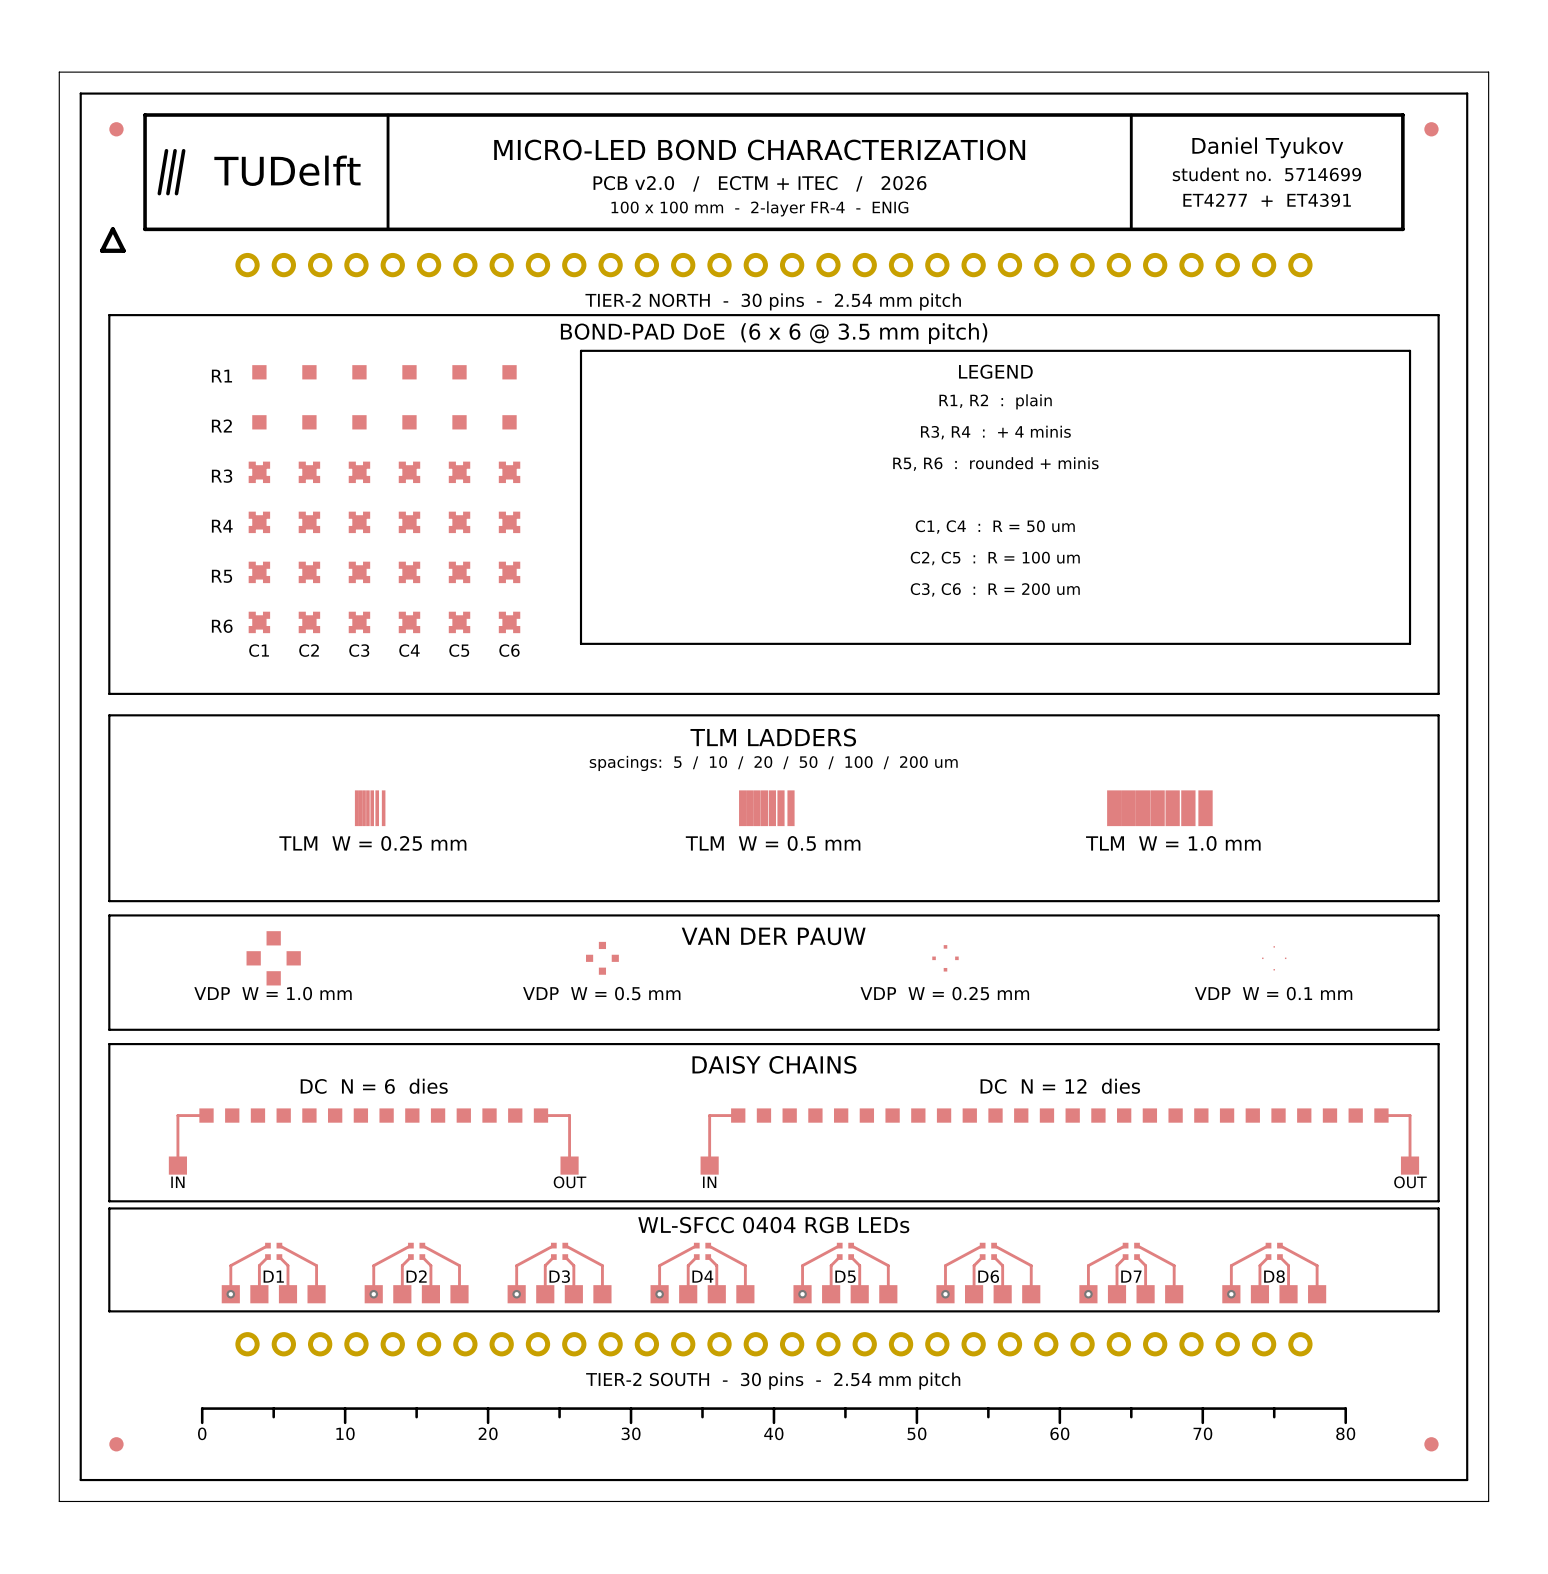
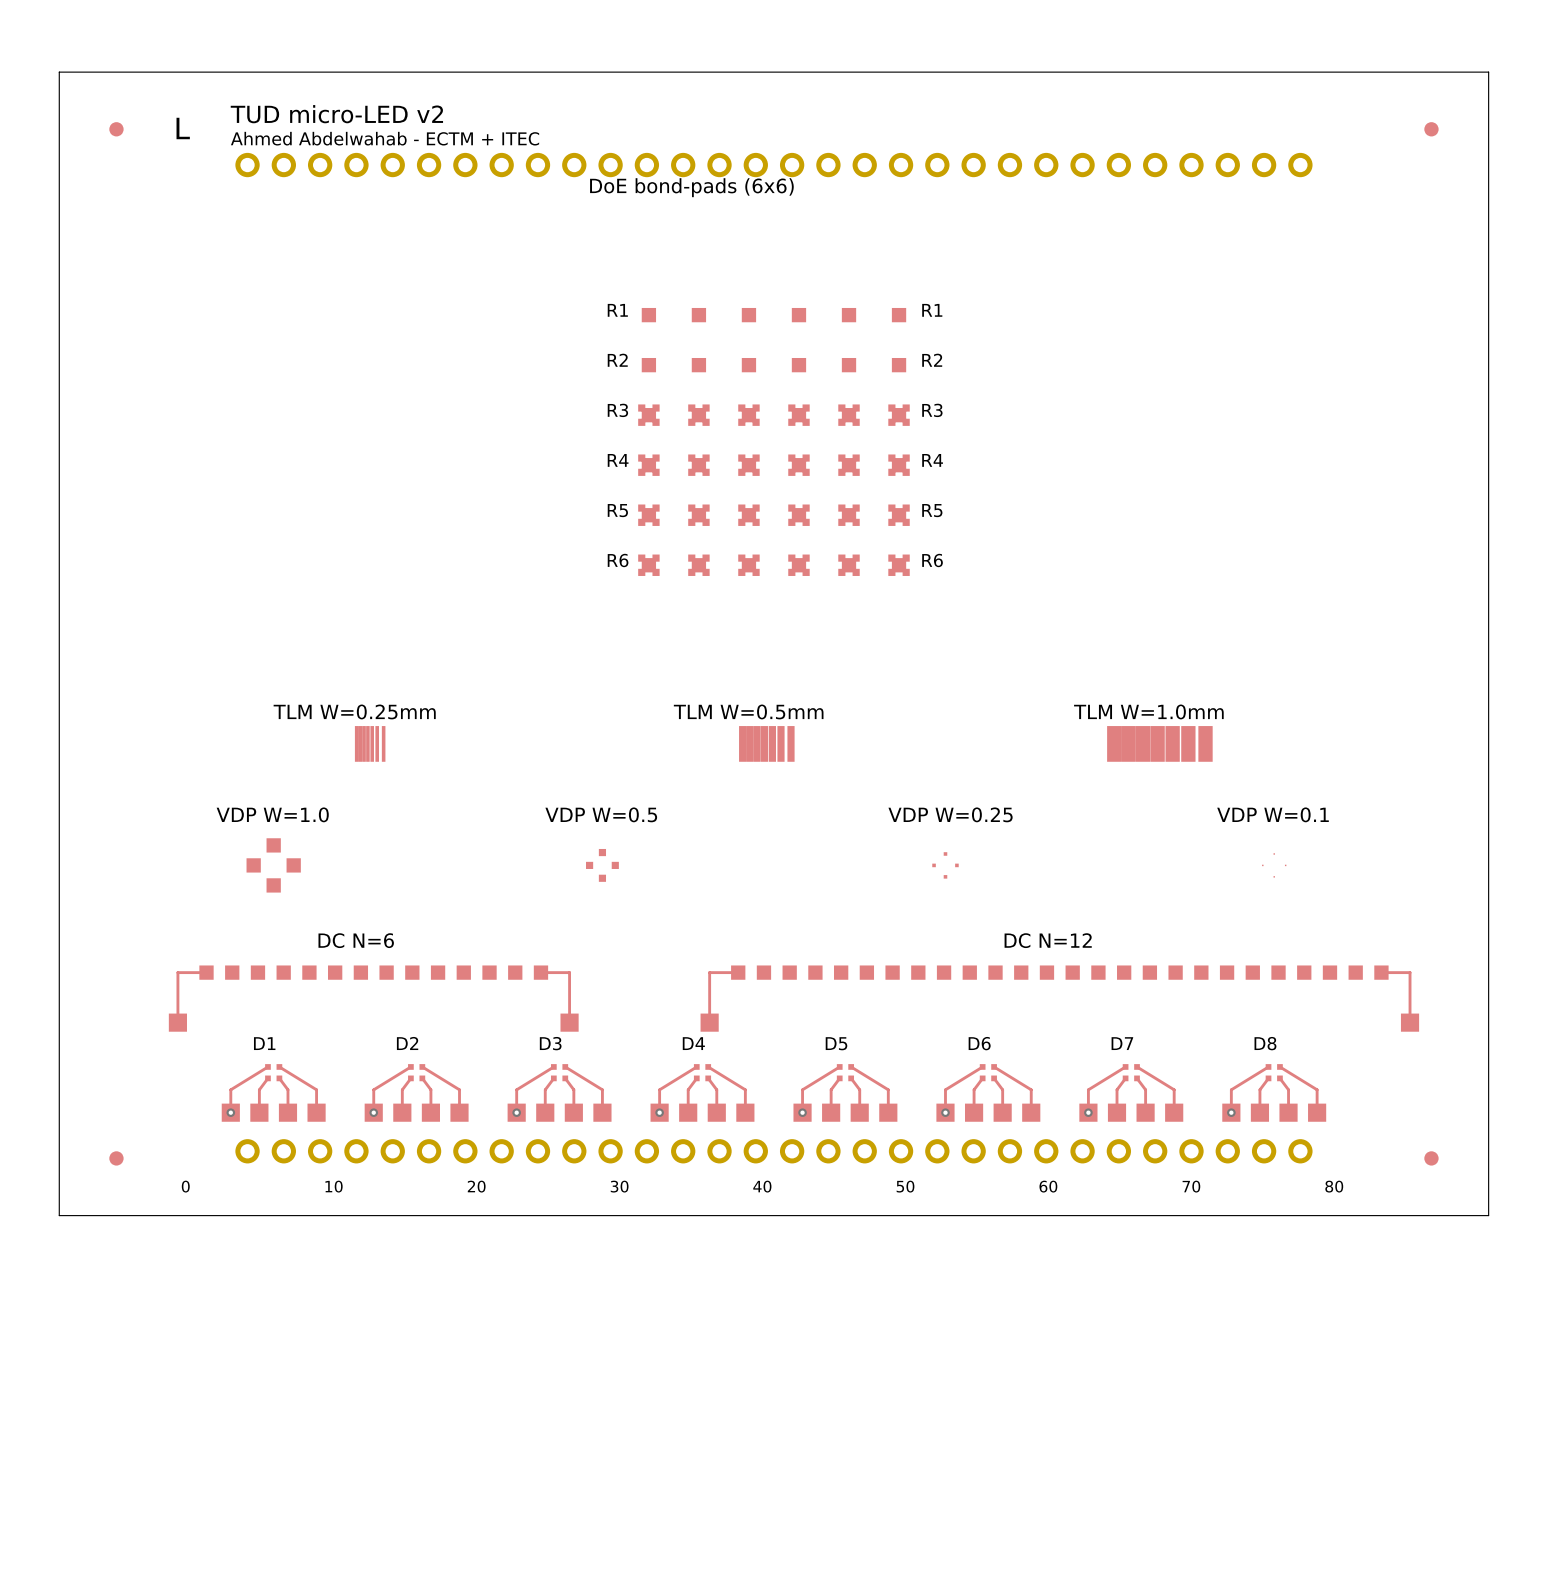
line: (80, 93) (1467, 93) (1467, 1480) (80, 1480) (80, 93) -> none
text: none -> TUD micro-LED v2 (336, 114)
line: (145, 115) (1402, 115) (1402, 229) (145, 229) (145, 115) -> none
line: (388, 115) (388, 229) -> none
line: (1131, 115) (1131, 229) -> none
text: none -> L (183, 128)
text: none -> Ahmed Abdelwahab - ECTM + ITEC (385, 138)
text: Daniel Tyukov (1267, 147) -> none
line: (166, 150) (159, 193) -> none
line: (175, 150) (167, 193) -> none
line: (183, 150) (176, 193) -> none
text: MICRO-LED BOND CHARACTERIZATION (759, 150) -> none
part: none -> (247, 165)
part: none -> (283, 165)
part: none -> (320, 165)
part: none -> (356, 165)
part: none -> (392, 165)
part: none -> (429, 165)
part: none -> (465, 165)
part: none -> (501, 165)
part: none -> (537, 165)
part: none -> (574, 165)
part: none -> (610, 165)
part: none -> (646, 165)
part: none -> (683, 165)
part: none -> (719, 165)
part: none -> (755, 165)
part: none -> (792, 165)
part: none -> (828, 165)
part: none -> (864, 165)
part: none -> (901, 165)
part: none -> (937, 165)
part: none -> (973, 165)
part: none -> (1009, 165)
part: none -> (1046, 165)
part: none -> (1082, 165)
part: none -> (1118, 165)
part: none -> (1155, 165)
part: none -> (1191, 165)
part: none -> (1227, 165)
part: none -> (1264, 165)
part: none -> (1300, 165)
text: TUDelft (287, 170) -> none
text: student no. 5714699 (1266, 174) -> none
text: PCB v2.0 / ECTM + ITEC / 2026 (759, 183) -> none
text: none -> DoE bond-pads (6x6) (691, 187)
text: ET4277 + ET4391 (1267, 200) -> none
text: 100 x 100 mm - 2-layer FR-4 - ENIG (759, 208) -> none
line: (112, 229) (123, 250) (102, 250) (112, 229) -> none
part: (247, 265) -> none
part: (283, 265) -> none
part: (320, 265) -> none
part: (356, 265) -> none
part: (392, 265) -> none
part: (429, 265) -> none
part: (465, 265) -> none
part: (501, 265) -> none
part: (537, 265) -> none
part: (574, 265) -> none
part: (610, 265) -> none
part: (646, 265) -> none
part: (683, 265) -> none
part: (719, 265) -> none
part: (755, 265) -> none
part: (792, 265) -> none
part: (828, 265) -> none
part: (864, 265) -> none
part: (901, 265) -> none
part: (937, 265) -> none
part: (973, 265) -> none
part: (1009, 265) -> none
part: (1046, 265) -> none
part: (1082, 265) -> none
part: (1118, 265) -> none
part: (1155, 265) -> none
part: (1191, 265) -> none
part: (1227, 265) -> none
part: (1264, 265) -> none
part: (1300, 265) -> none
text: TIER-2 NORTH - 30 pins - 2.54 mm pitch (773, 301) -> none
text: none -> R1 (617, 310)
text: none -> R1 (932, 310)
line: (109, 315) (1438, 315) (1438, 693) (109, 693) (109, 315) -> none
part: none -> (648, 315)
part: none -> (698, 315)
part: none -> (748, 315)
part: none -> (798, 315)
part: none -> (849, 315)
part: none -> (899, 315)
text: BOND-PAD DoE (6 x 6 @ 3.5 mm pitch) (774, 333) -> none
line: (581, 350) (1410, 350) (1410, 643) (581, 643) (581, 350) -> none
text: none -> R2 (617, 360)
text: none -> R2 (932, 360)
part: none -> (648, 365)
part: none -> (698, 365)
part: none -> (748, 365)
part: none -> (798, 365)
part: none -> (849, 365)
part: none -> (899, 365)
text: LEGEND (995, 371) -> none
part: (259, 372) -> none
part: (309, 372) -> none
part: (359, 372) -> none
part: (409, 372) -> none
part: (459, 372) -> none
part: (509, 372) -> none
text: R1 (221, 376) -> none
text: R1, R2 : plain (995, 401) -> none
text: none -> R3 (617, 410)
text: none -> R3 (932, 410)
part: none -> (648, 415)
part: none -> (698, 415)
part: none -> (748, 415)
part: none -> (798, 415)
part: none -> (849, 415)
part: none -> (899, 415)
part: (259, 422) -> none
part: (309, 422) -> none
part: (359, 422) -> none
part: (409, 422) -> none
part: (459, 422) -> none
part: (509, 422) -> none
text: R2 (221, 426) -> none
text: R3, R4 : + 4 minis (995, 432) -> none
text: none -> R4 (618, 460)
text: none -> R4 (932, 460)
text: R5, R6 : rounded + minis (995, 464) -> none
part: none -> (648, 465)
part: none -> (698, 465)
part: none -> (748, 465)
part: none -> (798, 465)
part: none -> (849, 465)
part: none -> (899, 465)
part: (259, 472) -> none
part: (309, 472) -> none
part: (359, 472) -> none
part: (409, 472) -> none
part: (459, 472) -> none
part: (509, 472) -> none
text: R3 (222, 476) -> none
text: none -> R5 (617, 510)
text: none -> R5 (932, 510)
part: none -> (648, 515)
part: none -> (698, 515)
part: none -> (748, 515)
part: none -> (798, 515)
part: none -> (849, 515)
part: none -> (899, 515)
part: (259, 522) -> none
part: (309, 522) -> none
part: (359, 522) -> none
part: (409, 522) -> none
part: (459, 522) -> none
part: (509, 522) -> none
text: R4 (222, 526) -> none
text: C1, C4 : R = 50 um (995, 527) -> none
text: C2, C5 : R = 100 um (995, 558) -> none
text: none -> R6 (618, 560)
text: none -> R6 (932, 560)
part: none -> (648, 565)
part: none -> (698, 565)
part: none -> (748, 565)
part: none -> (798, 565)
part: none -> (849, 565)
part: none -> (899, 565)
part: (259, 572) -> none
part: (309, 572) -> none
part: (359, 572) -> none
part: (409, 572) -> none
part: (459, 572) -> none
part: (509, 572) -> none
text: R5 (222, 576) -> none
text: C3, C6 : R = 200 um (995, 589) -> none
part: (259, 622) -> none
part: (309, 622) -> none
part: (359, 622) -> none
part: (409, 622) -> none
part: (459, 622) -> none
part: (509, 622) -> none
text: R6 (222, 626) -> none
text: C1 (259, 650) -> none
text: C2 (309, 650) -> none
text: C3 (359, 650) -> none
text: C4 (409, 650) -> none
text: C5 (459, 650) -> none
text: C6 (509, 650) -> none
text: none -> TLM W=0.25mm (354, 711)
text: none -> TLM W=0.5mm (748, 711)
text: none -> TLM W=1.0mm (1148, 711)
line: (109, 715) (109, 901) (1438, 901) (1438, 715) (109, 715) -> none
text: TLM LADDERS (773, 737) -> none
text: spacings: 5 / 10 / 20 / 50 / 100 / 200 um (773, 763) -> none
part position: (370, 808) -> (370, 743)
part position: (766, 808) -> (766, 743)
part position: (1159, 808) -> (1159, 743)
text: none -> VDP W=1.0 (272, 814)
text: none -> VDP W=0.5 (601, 814)
text: none -> VDP W=0.25 (950, 814)
text: none -> VDP W=0.1 (1273, 814)
text: TLM W = 0.25 mm (372, 843) -> none
text: TLM W = 0.5 mm (773, 843) -> none
text: TLM W = 1.0 mm (1173, 843) -> none
line: (109, 915) (109, 1029) (1438, 1029) (1438, 915) (109, 915) -> none
text: VAN DER PAUW (773, 936) -> none
text: none -> DC N=6 (356, 940)
text: none -> DC N=12 (1048, 940)
part position: (273, 958) -> (273, 865)
part position: (602, 958) -> (602, 865)
part position: (945, 958) -> (945, 865)
part position: (1274, 958) -> (1274, 865)
part: none -> (373, 972)
text: VDP W = 1.0 mm (273, 993) -> none
text: VDP W = 0.5 mm (601, 993) -> none
text: VDP W = 0.25 mm (944, 993) -> none
text: VDP W = 0.1 mm (1273, 993) -> none
part: none -> (177, 1022)
part: none -> (569, 1022)
part: none -> (709, 1022)
part: none -> (1410, 1022)
line: (109, 1044) (109, 1201) (1438, 1201) (1438, 1044) (109, 1044) -> none
text: DAISY CHAINS (774, 1064) -> none
track: none -> (267, 1066) (230, 1089) (230, 1112)
track: none -> (279, 1066) (316, 1089) (316, 1112)
track: none -> (410, 1066) (373, 1089) (373, 1112)
track: none -> (422, 1066) (459, 1089) (459, 1112)
track: none -> (553, 1066) (516, 1089) (516, 1112)
track: none -> (565, 1066) (602, 1089) (602, 1112)
track: none -> (696, 1066) (659, 1089) (659, 1112)
track: none -> (708, 1066) (745, 1089) (745, 1112)
track: none -> (839, 1066) (802, 1089) (802, 1112)
track: none -> (851, 1066) (888, 1089) (888, 1112)
track: none -> (982, 1066) (945, 1089) (945, 1112)
track: none -> (994, 1066) (1031, 1089) (1031, 1112)
track: none -> (1125, 1066) (1088, 1089) (1088, 1112)
track: none -> (1137, 1066) (1174, 1089) (1174, 1112)
track: none -> (1268, 1066) (1231, 1089) (1231, 1112)
track: none -> (1279, 1066) (1317, 1089) (1317, 1112)
part: none -> (273, 1072)
part: none -> (416, 1072)
part: none -> (559, 1072)
part: none -> (702, 1072)
part: none -> (845, 1072)
part: none -> (988, 1072)
part: none -> (1131, 1072)
part: none -> (1274, 1072)
track: none -> (267, 1078) (259, 1089) (259, 1112)
track: none -> (279, 1078) (287, 1089) (287, 1112)
track: none -> (410, 1078) (402, 1089) (402, 1112)
track: none -> (422, 1078) (430, 1089) (430, 1112)
track: none -> (553, 1078) (545, 1089) (545, 1112)
track: none -> (565, 1078) (573, 1089) (573, 1112)
track: none -> (696, 1078) (688, 1089) (688, 1112)
track: none -> (708, 1078) (716, 1089) (716, 1112)
track: none -> (839, 1078) (831, 1089) (831, 1112)
track: none -> (851, 1078) (859, 1089) (859, 1112)
track: none -> (982, 1078) (974, 1089) (974, 1112)
track: none -> (994, 1078) (1002, 1089) (1002, 1112)
track: none -> (1125, 1078) (1117, 1089) (1117, 1112)
track: none -> (1137, 1078) (1145, 1089) (1145, 1112)
track: none -> (1268, 1078) (1259, 1089) (1259, 1112)
track: none -> (1279, 1078) (1288, 1089) (1288, 1112)
text: DC N = 6 dies (374, 1086) -> none
text: DC N = 12 dies (1060, 1086) -> none
part footprint: [199, 1108, 549, 1123] -> [364, 1103, 383, 1122]
part: none -> (230, 1112)
via: none -> (230, 1112)
part: none -> (259, 1112)
part: none -> (287, 1112)
part: none -> (316, 1112)
via: none -> (373, 1112)
part: none -> (402, 1112)
part: none -> (430, 1112)
part: none -> (459, 1112)
part: none -> (516, 1112)
via: none -> (516, 1112)
part: none -> (545, 1112)
part: none -> (573, 1112)
part: none -> (602, 1112)
part: none -> (659, 1112)
via: none -> (659, 1112)
part: none -> (688, 1112)
part: none -> (716, 1112)
part: none -> (745, 1112)
part: none -> (802, 1112)
via: none -> (802, 1112)
part: none -> (831, 1112)
part: none -> (859, 1112)
part: none -> (888, 1112)
part: none -> (945, 1112)
via: none -> (945, 1112)
part: none -> (974, 1112)
part: none -> (1002, 1112)
part: none -> (1031, 1112)
part: none -> (1088, 1112)
via: none -> (1088, 1112)
part: none -> (1117, 1112)
part: none -> (1145, 1112)
part: none -> (1174, 1112)
part: none -> (1231, 1112)
via: none -> (1231, 1112)
part: none -> (1259, 1112)
part: none -> (1288, 1112)
part: none -> (1317, 1112)
track: (206, 1115) (177, 1115) (177, 1165) -> (206, 972) (177, 972) (177, 1022)
track: (540, 1115) (569, 1115) (569, 1165) -> (540, 972) (569, 972) (569, 1022)
track: (738, 1115) (709, 1115) (709, 1165) -> (738, 972) (709, 972) (709, 1022)
part position: (1059, 1115) -> (1059, 972)
track: (1381, 1115) (1410, 1115) (1410, 1165) -> (1381, 972) (1410, 972) (1410, 1022)
part: none -> (247, 1151)
part: none -> (283, 1151)
part: none -> (320, 1151)
part: none -> (356, 1151)
part: none -> (392, 1151)
part: none -> (429, 1151)
part: none -> (465, 1151)
part: none -> (501, 1151)
part: none -> (537, 1151)
part: none -> (574, 1151)
part: none -> (610, 1151)
part: none -> (646, 1151)
part: none -> (683, 1151)
part: none -> (719, 1151)
part: none -> (755, 1151)
part: none -> (792, 1151)
part: none -> (828, 1151)
part: none -> (864, 1151)
part: none -> (901, 1151)
part: none -> (937, 1151)
part: none -> (973, 1151)
part: none -> (1009, 1151)
part: none -> (1046, 1151)
part: none -> (1082, 1151)
part: none -> (1118, 1151)
part: none -> (1155, 1151)
part: none -> (1191, 1151)
part: none -> (1227, 1151)
part: none -> (1264, 1151)
part: none -> (1300, 1151)
part: (177, 1165) -> none
part: (569, 1165) -> none
part: (709, 1165) -> none
part: (1410, 1165) -> none
text: IN (177, 1182) -> none
text: OUT (570, 1182) -> none
text: IN (709, 1182) -> none
text: OUT (1410, 1182) -> none
line: (109, 1208) (109, 1311) (1438, 1311) (1438, 1208) (109, 1208) -> none
board edge: (59, 1215) (59, 1501) (1488, 1501) (1488, 1215) -> (59, 1215) (1488, 1215)
text: WL-SFCC 0404 RGB LEDs (773, 1225) -> none
track: (267, 1245) (230, 1265) (230, 1294) -> none
track: (279, 1245) (316, 1265) (316, 1294) -> none
track: (410, 1245) (373, 1265) (373, 1294) -> none
track: (422, 1245) (459, 1265) (459, 1294) -> none
track: (553, 1245) (516, 1265) (516, 1294) -> none
track: (565, 1245) (602, 1265) (602, 1294) -> none
track: (696, 1245) (659, 1265) (659, 1294) -> none
track: (708, 1245) (745, 1265) (745, 1294) -> none
track: (839, 1245) (802, 1265) (802, 1294) -> none
track: (851, 1245) (888, 1265) (888, 1294) -> none
track: (982, 1245) (945, 1265) (945, 1294) -> none
track: (994, 1245) (1031, 1265) (1031, 1294) -> none
track: (1125, 1245) (1088, 1265) (1088, 1294) -> none
track: (1137, 1245) (1174, 1265) (1174, 1294) -> none
track: (1268, 1245) (1231, 1265) (1231, 1294) -> none
track: (1279, 1245) (1317, 1265) (1317, 1294) -> none
part: (273, 1251) -> none
part: (416, 1251) -> none
part: (559, 1251) -> none
part: (702, 1251) -> none
part: (845, 1251) -> none
part: (988, 1251) -> none
part: (1131, 1251) -> none
part: (1274, 1251) -> none
track: (267, 1257) (259, 1265) (259, 1294) -> none
track: (279, 1257) (287, 1265) (287, 1294) -> none
track: (410, 1257) (402, 1265) (402, 1294) -> none
track: (422, 1257) (430, 1265) (430, 1294) -> none
track: (553, 1257) (545, 1265) (545, 1294) -> none
track: (565, 1257) (573, 1265) (573, 1294) -> none
track: (696, 1257) (688, 1265) (688, 1294) -> none
track: (708, 1257) (716, 1265) (716, 1294) -> none
track: (839, 1257) (831, 1265) (831, 1294) -> none
track: (851, 1257) (859, 1265) (859, 1294) -> none
track: (982, 1257) (974, 1265) (974, 1294) -> none
track: (994, 1257) (1002, 1265) (1002, 1294) -> none
track: (1125, 1257) (1117, 1265) (1117, 1294) -> none
track: (1137, 1257) (1145, 1265) (1145, 1294) -> none
track: (1268, 1257) (1259, 1265) (1259, 1294) -> none
track: (1279, 1257) (1288, 1265) (1288, 1294) -> none
text position: D1 (273, 1276) -> D1 (264, 1043)
text position: D2 (416, 1276) -> D2 (407, 1043)
text position: D3 (559, 1276) -> D3 (550, 1043)
text position: D4 (702, 1276) -> D4 (693, 1043)
text position: D5 (845, 1276) -> D5 (836, 1043)
text position: D6 (988, 1276) -> D6 (979, 1043)
text position: D7 (1131, 1276) -> D7 (1122, 1043)
text position: D8 (1274, 1276) -> D8 (1265, 1043)
part: (230, 1294) -> none
via: (230, 1294) -> none
part: (259, 1294) -> none
part: (287, 1294) -> none
part: (316, 1294) -> none
part: (373, 1294) -> none
via: (373, 1294) -> none
part: (402, 1294) -> none
part: (430, 1294) -> none
part: (459, 1294) -> none
part: (516, 1294) -> none
via: (516, 1294) -> none
part: (545, 1294) -> none
part: (573, 1294) -> none
part: (602, 1294) -> none
part: (659, 1294) -> none
via: (659, 1294) -> none
part: (688, 1294) -> none
part: (716, 1294) -> none
part: (745, 1294) -> none
part: (802, 1294) -> none
via: (802, 1294) -> none
part: (831, 1294) -> none
part: (859, 1294) -> none
part: (888, 1294) -> none
part: (945, 1294) -> none
via: (945, 1294) -> none
part: (974, 1294) -> none
part: (1002, 1294) -> none
part: (1031, 1294) -> none
part: (1088, 1294) -> none
via: (1088, 1294) -> none
part: (1117, 1294) -> none
part: (1145, 1294) -> none
part: (1174, 1294) -> none
part: (1231, 1294) -> none
via: (1231, 1294) -> none
part: (1259, 1294) -> none
part: (1288, 1294) -> none
part: (1317, 1294) -> none
part: (247, 1344) -> none
part: (283, 1344) -> none
part: (320, 1344) -> none
part: (356, 1344) -> none
part: (392, 1344) -> none
part: (429, 1344) -> none
part: (465, 1344) -> none
part: (501, 1344) -> none
part: (537, 1344) -> none
part: (574, 1344) -> none
part: (610, 1344) -> none
part: (646, 1344) -> none
part: (683, 1344) -> none
part: (719, 1344) -> none
part: (755, 1344) -> none
part: (792, 1344) -> none
part: (828, 1344) -> none
part: (864, 1344) -> none
part: (901, 1344) -> none
part: (937, 1344) -> none
part: (973, 1344) -> none
part: (1009, 1344) -> none
part: (1046, 1344) -> none
part: (1082, 1344) -> none
part: (1118, 1344) -> none
part: (1155, 1344) -> none
part: (1191, 1344) -> none
part: (1227, 1344) -> none
part: (1264, 1344) -> none
part: (1300, 1344) -> none
text: TIER-2 SOUTH - 30 pins - 2.54 mm pitch (773, 1381) -> none
line: (273, 1408) (273, 1417) -> none
line: (345, 1408) (345, 1422) -> none
line: (416, 1408) (416, 1417) -> none
line: (488, 1408) (488, 1422) -> none
line: (559, 1408) (559, 1417) -> none
line: (631, 1408) (631, 1422) -> none
line: (702, 1408) (702, 1417) -> none
line: (773, 1408) (773, 1422) -> none
line: (845, 1408) (845, 1417) -> none
line: (916, 1408) (916, 1422) -> none
line: (988, 1408) (988, 1417) -> none
line: (1059, 1408) (1059, 1422) -> none
line: (1131, 1408) (1131, 1417) -> none
line: (1202, 1408) (1202, 1422) -> none
line: (1274, 1408) (1274, 1417) -> none
line: (202, 1422) (202, 1408) (1345, 1408) (1345, 1422) -> none
text position: 0 (202, 1433) -> 0 (185, 1186)
text position: 10 (345, 1433) -> 10 (334, 1186)
text position: 20 (488, 1433) -> 20 (476, 1186)
text position: 30 (631, 1433) -> 30 (619, 1186)
text position: 40 (773, 1433) -> 40 (762, 1186)
text position: 50 (916, 1433) -> 50 (905, 1186)
text position: 60 (1059, 1433) -> 60 (1048, 1186)
text position: 70 (1202, 1433) -> 70 (1191, 1186)
text position: 80 (1345, 1433) -> 80 (1334, 1186)
part position: (116, 1444) -> (116, 1158)
part position: (1431, 1444) -> (1431, 1158)

